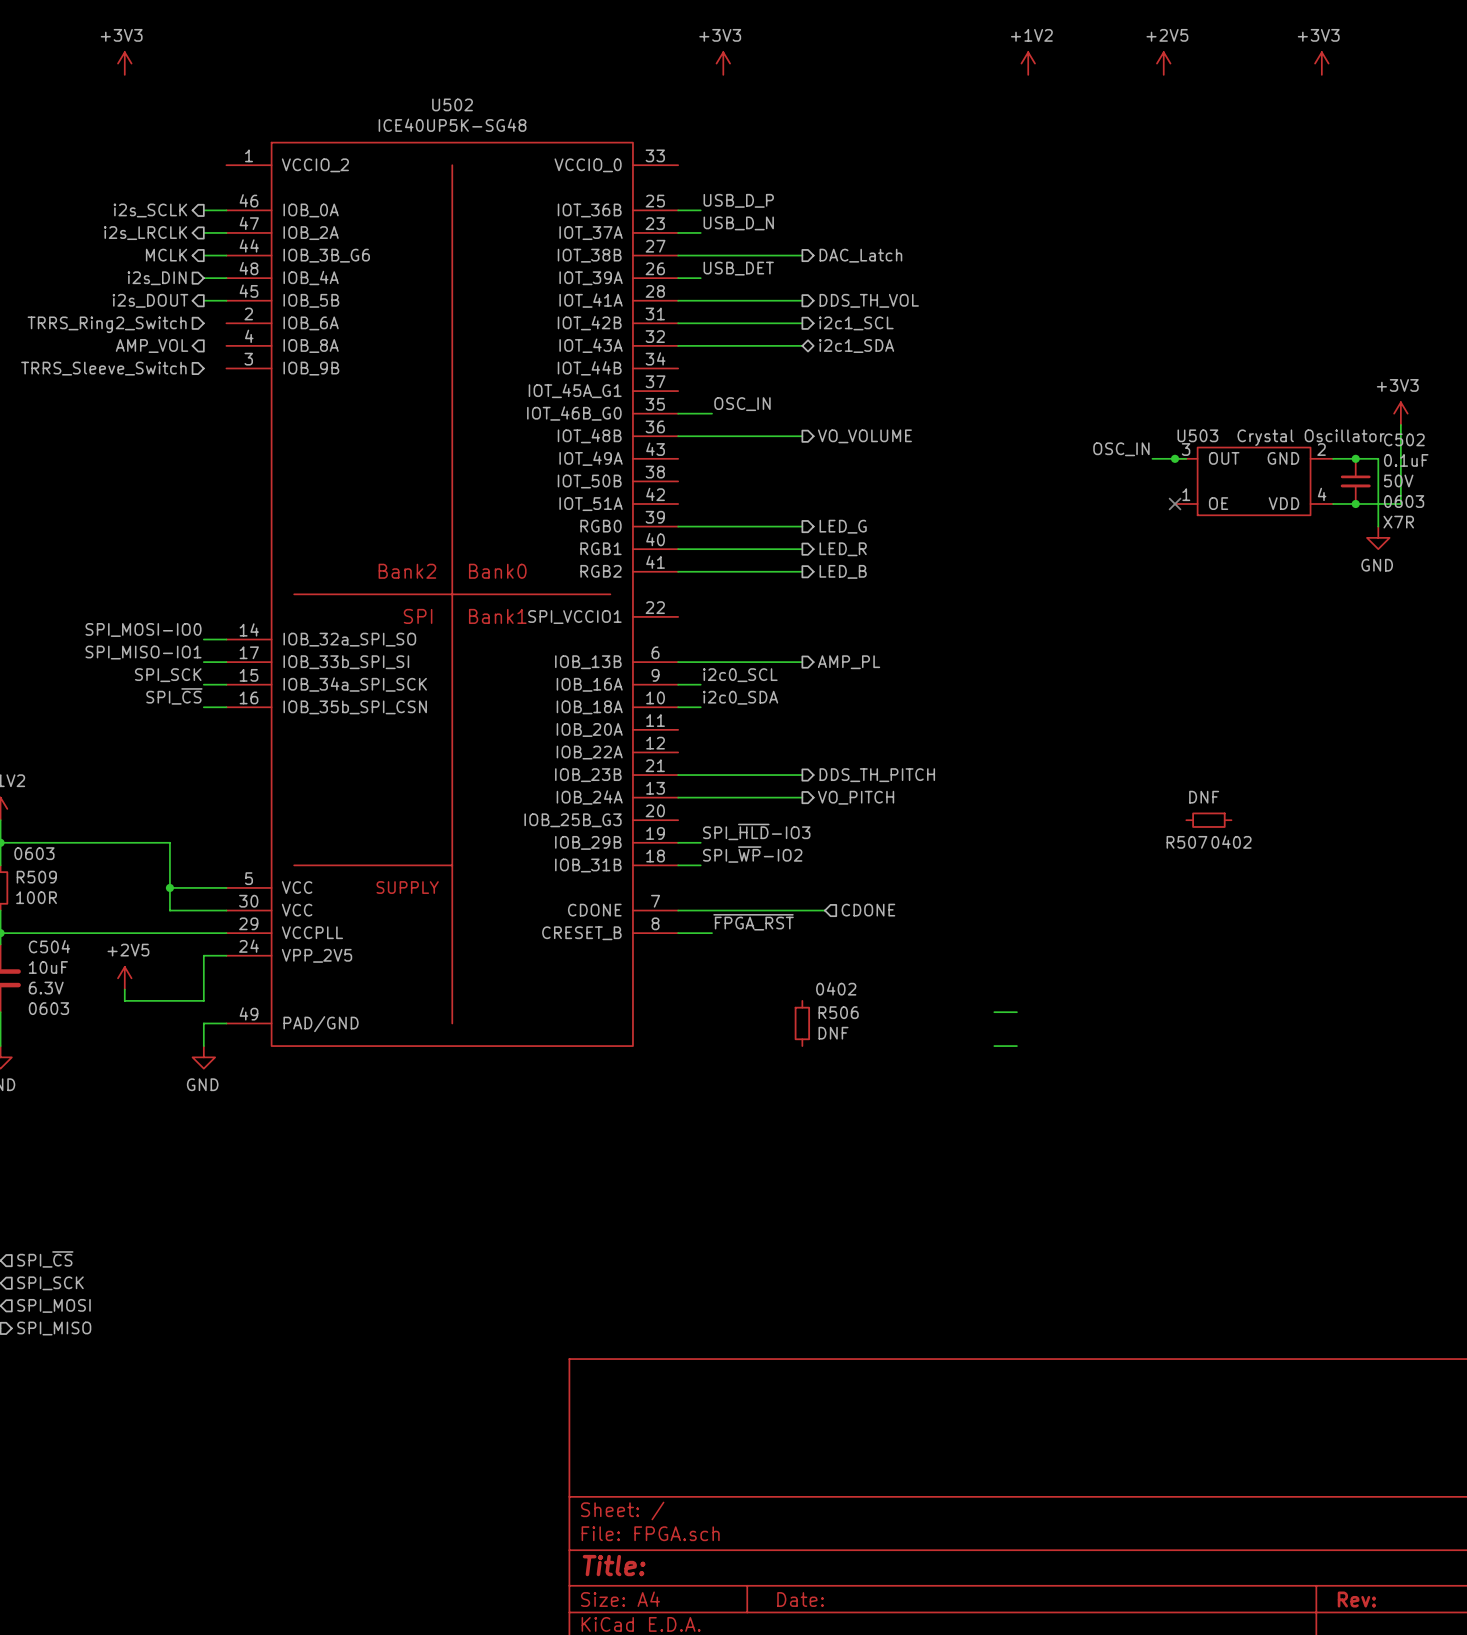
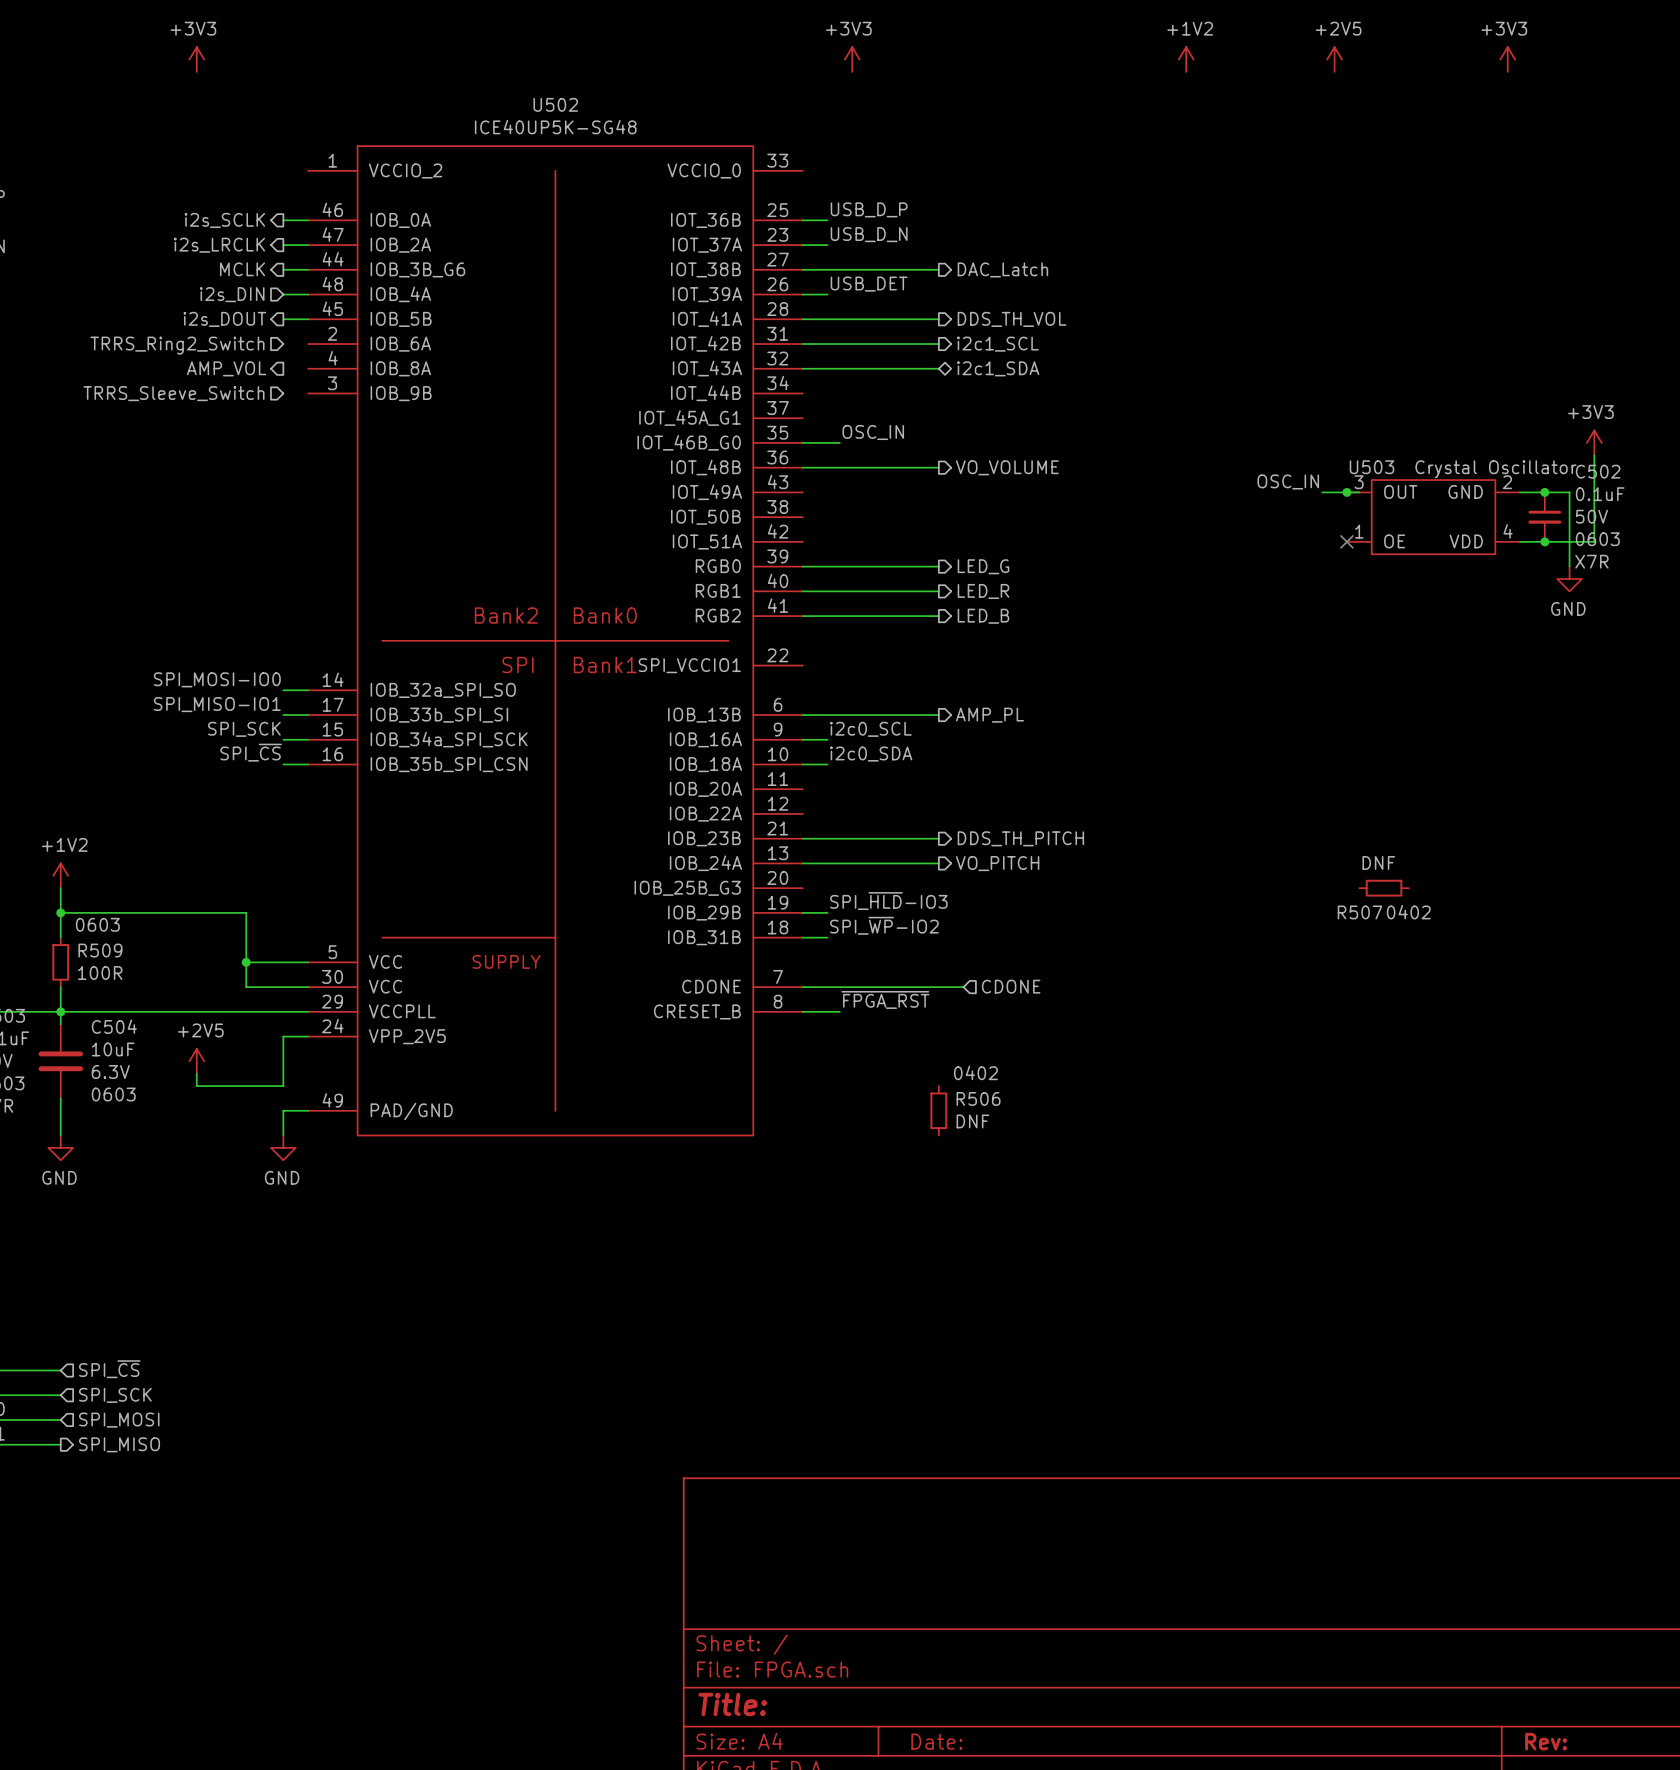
wire: (994, 1012) (1016, 1012) -> none
wire: (994, 1046) (1016, 1046) -> none

